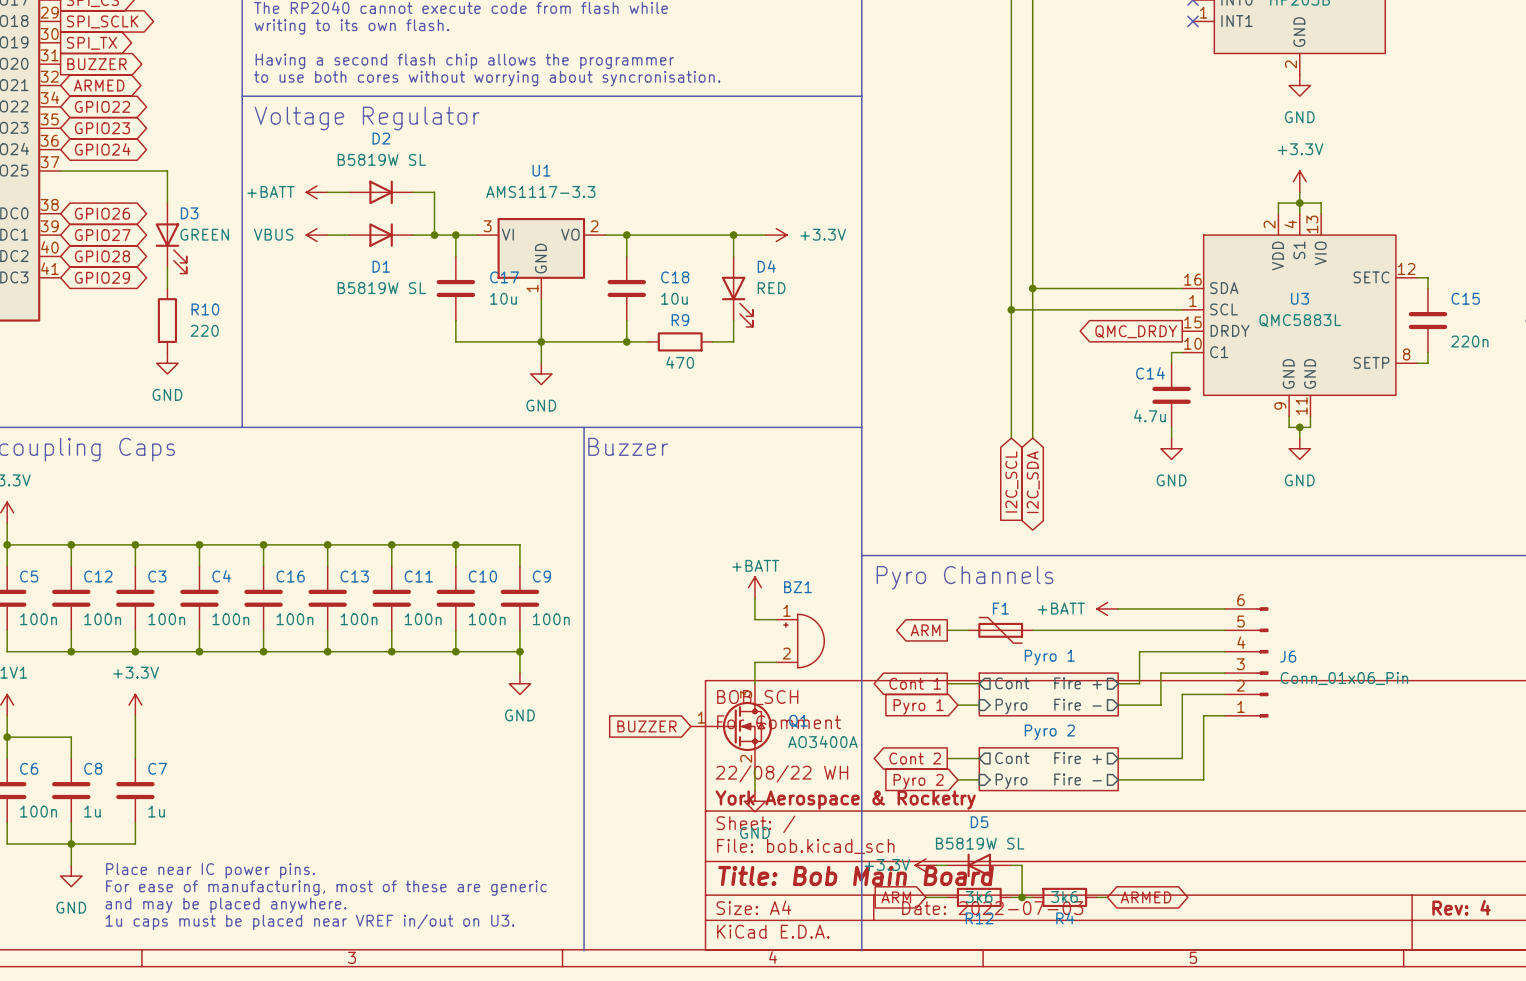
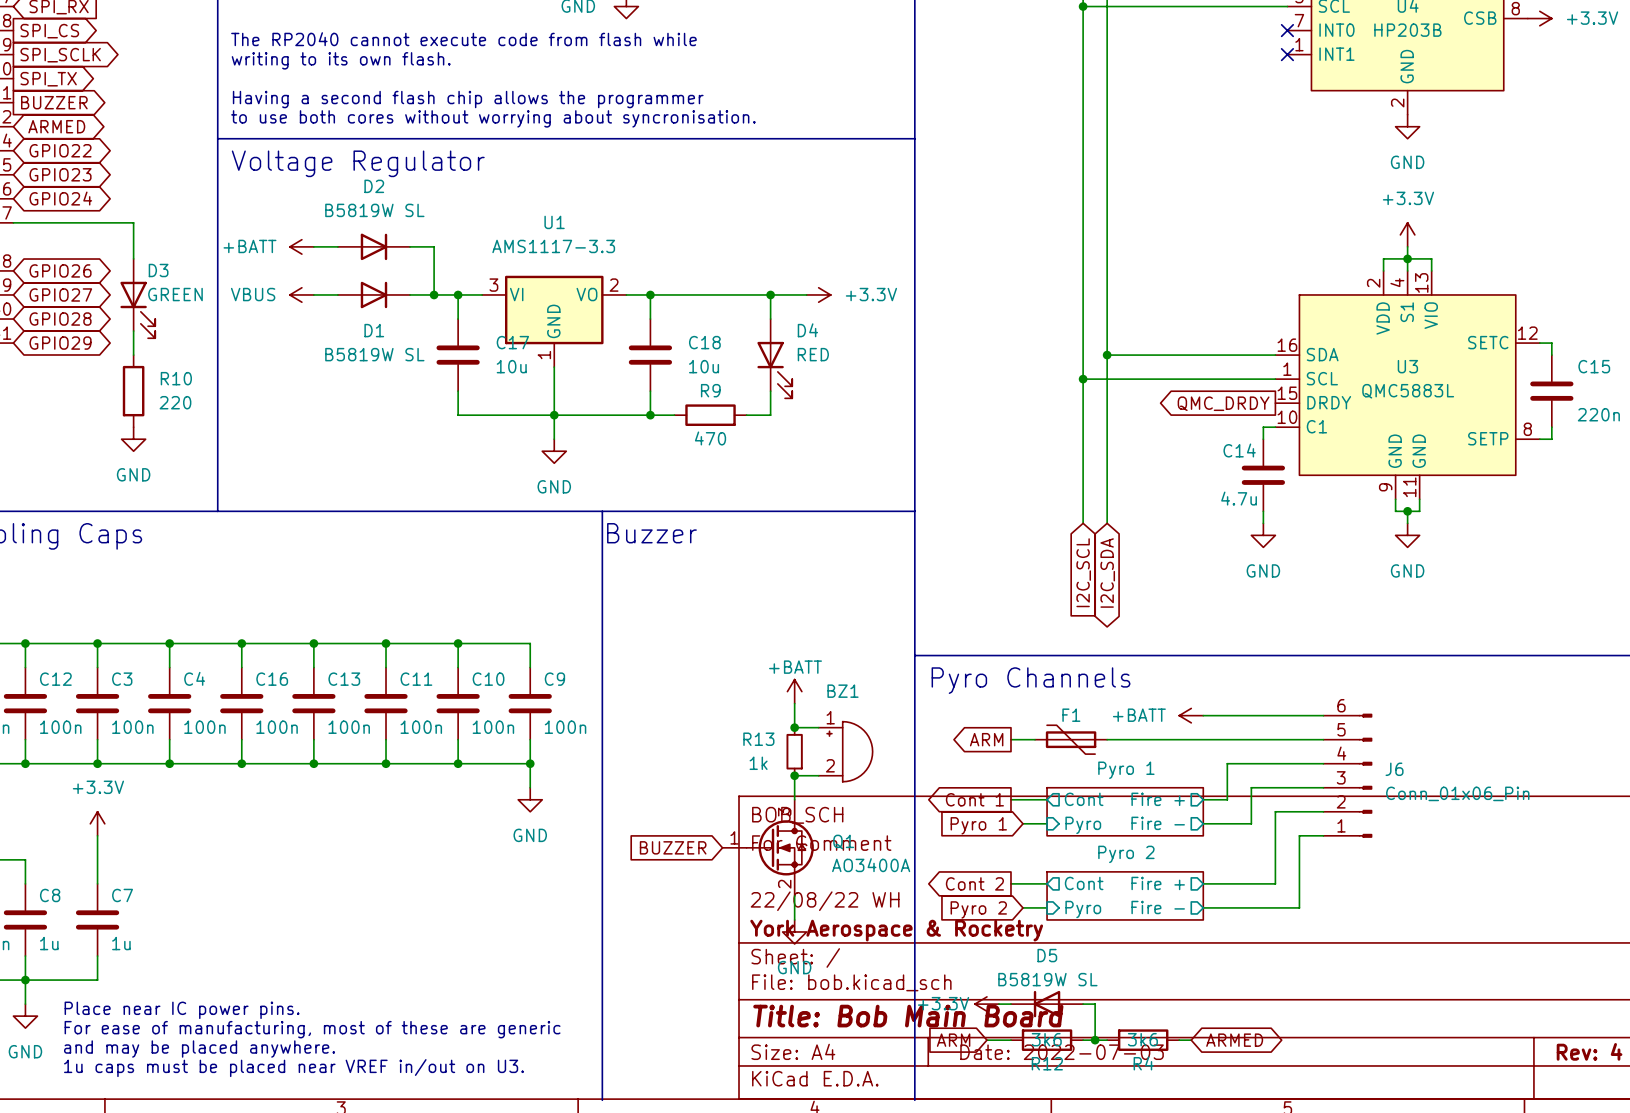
junction: none -> (794, 727)
R13: none -> 1k (794, 751)
junction: none -> (794, 775)

